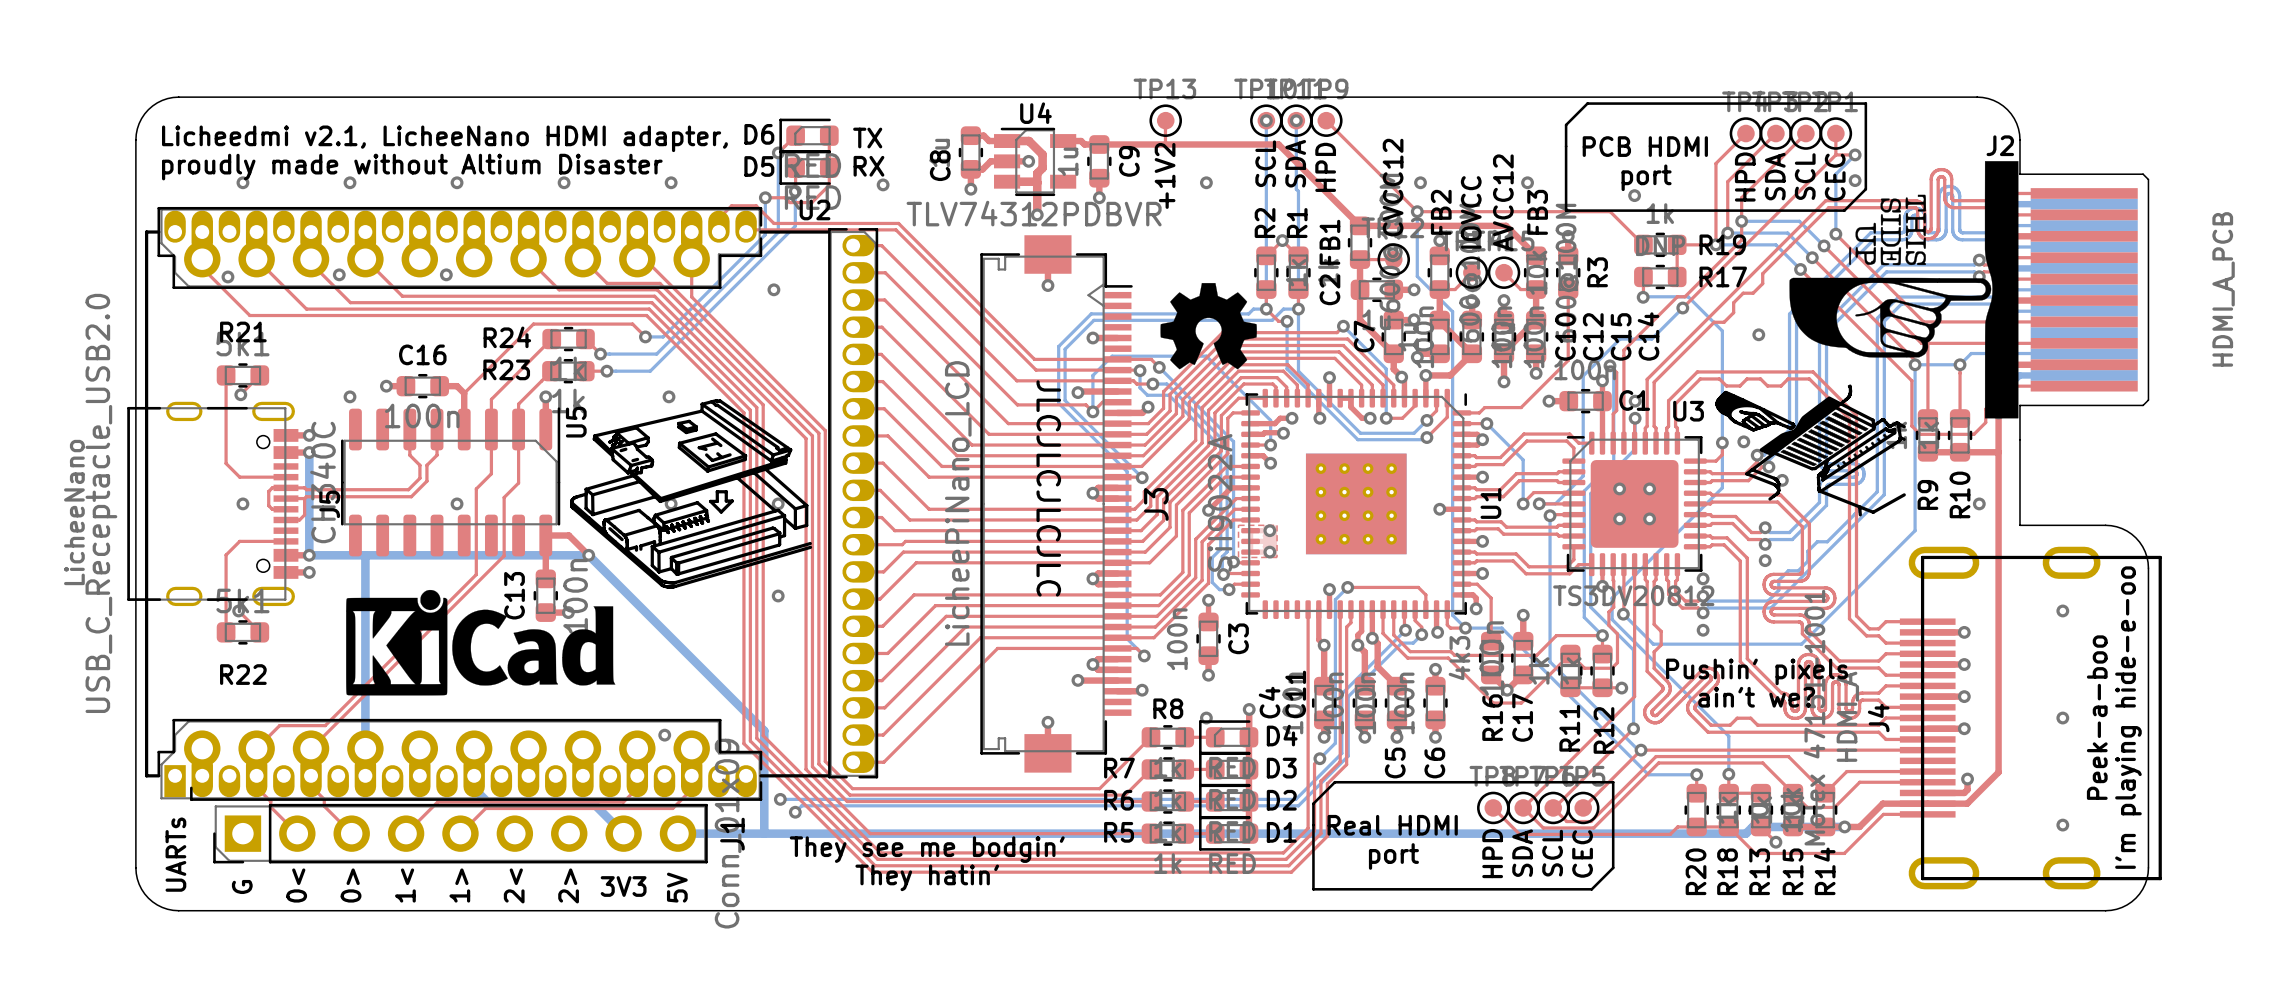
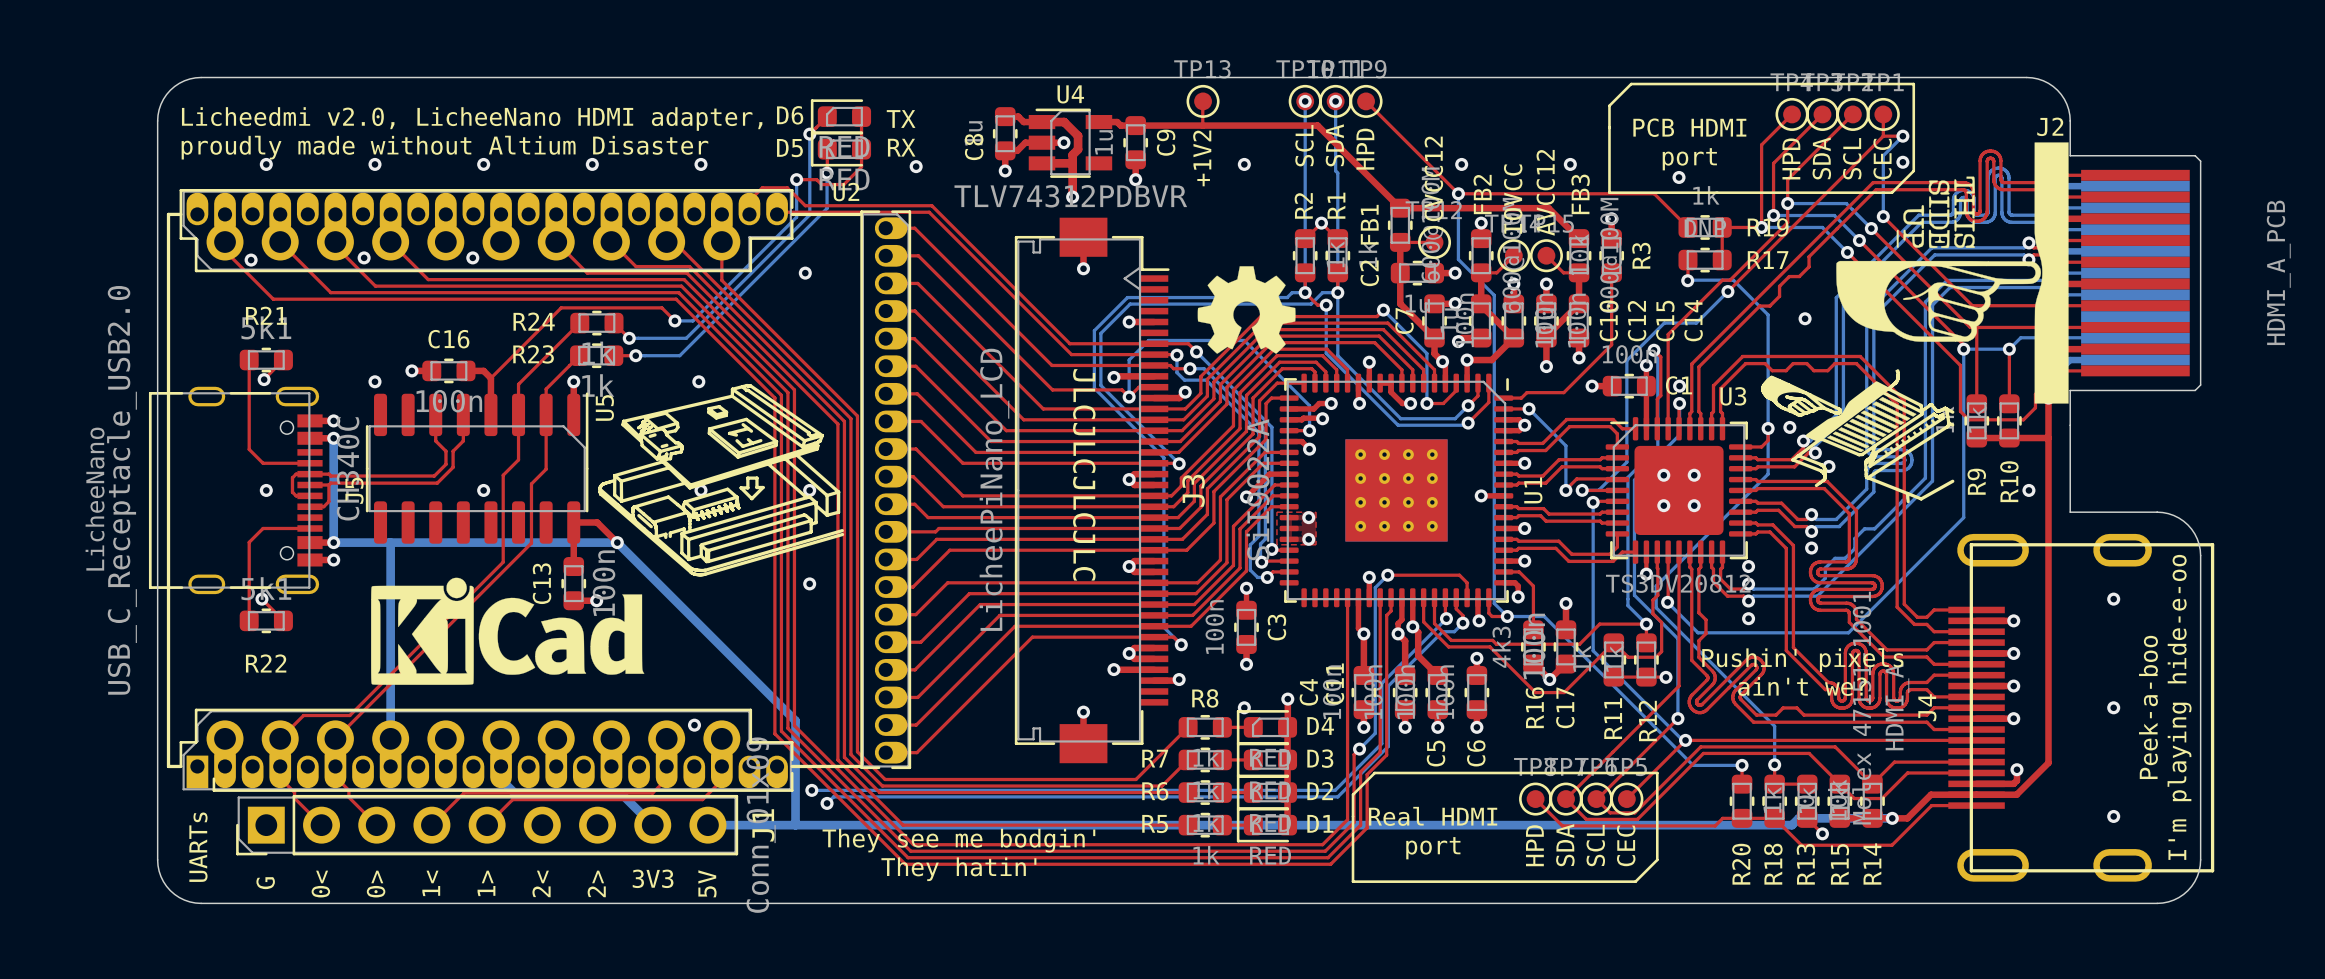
text: Licheedmi v2.1, LicheeNano HDMI adapter, (444, 138) -> Licheedmi v2.0, LicheeNano HDMI adapter, (472, 118)

